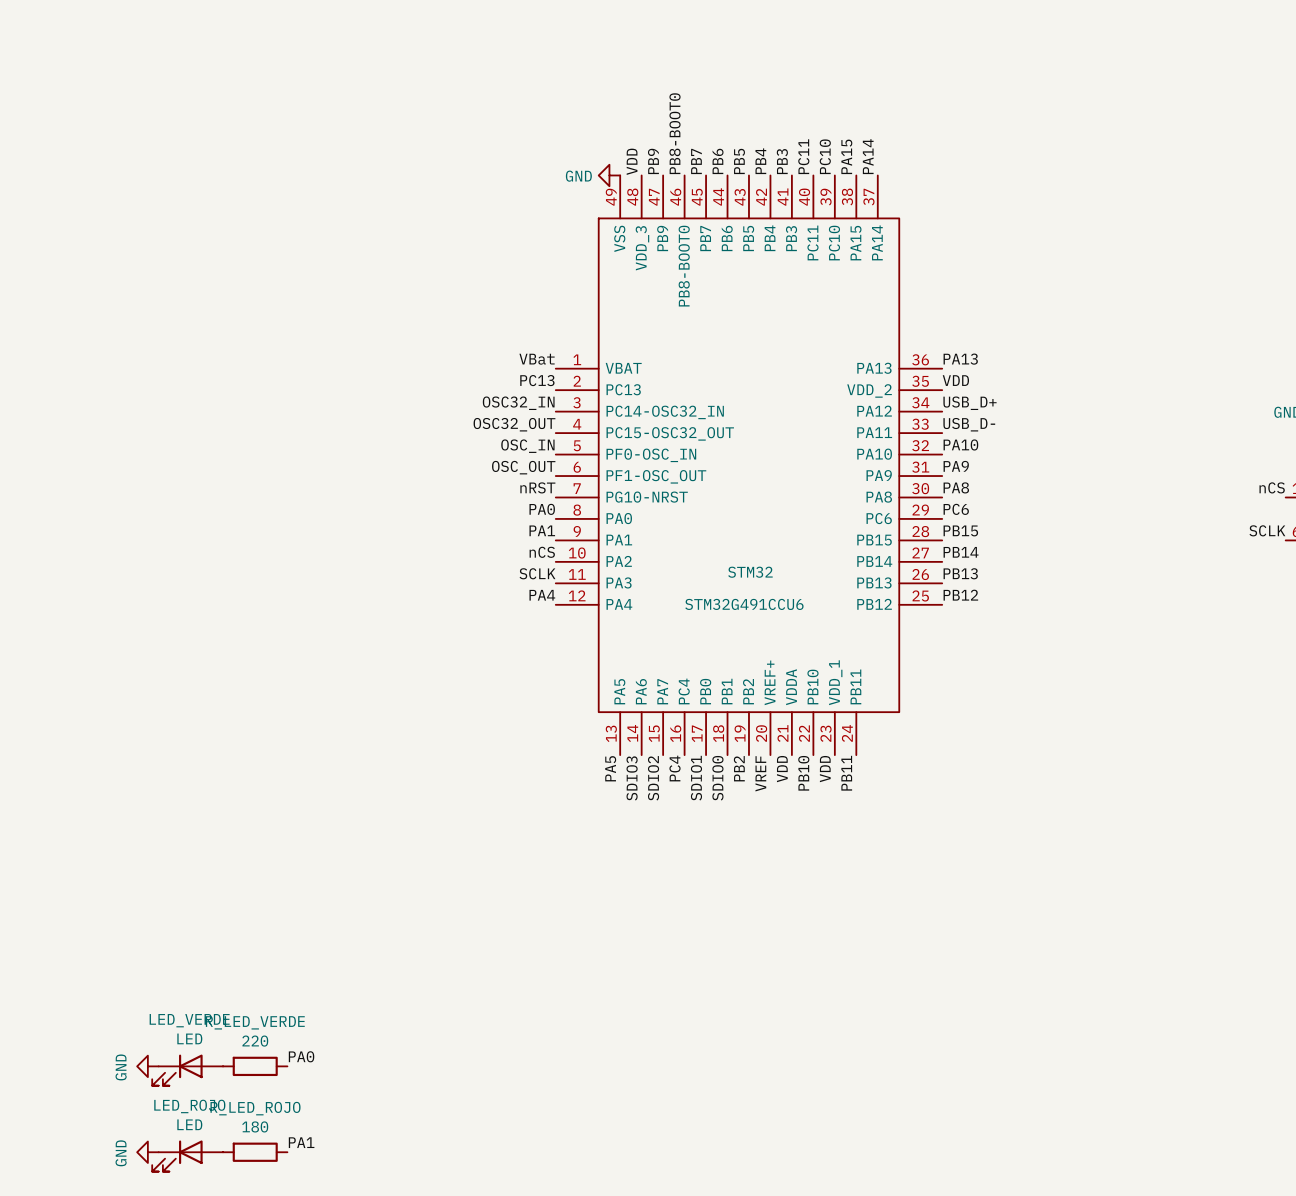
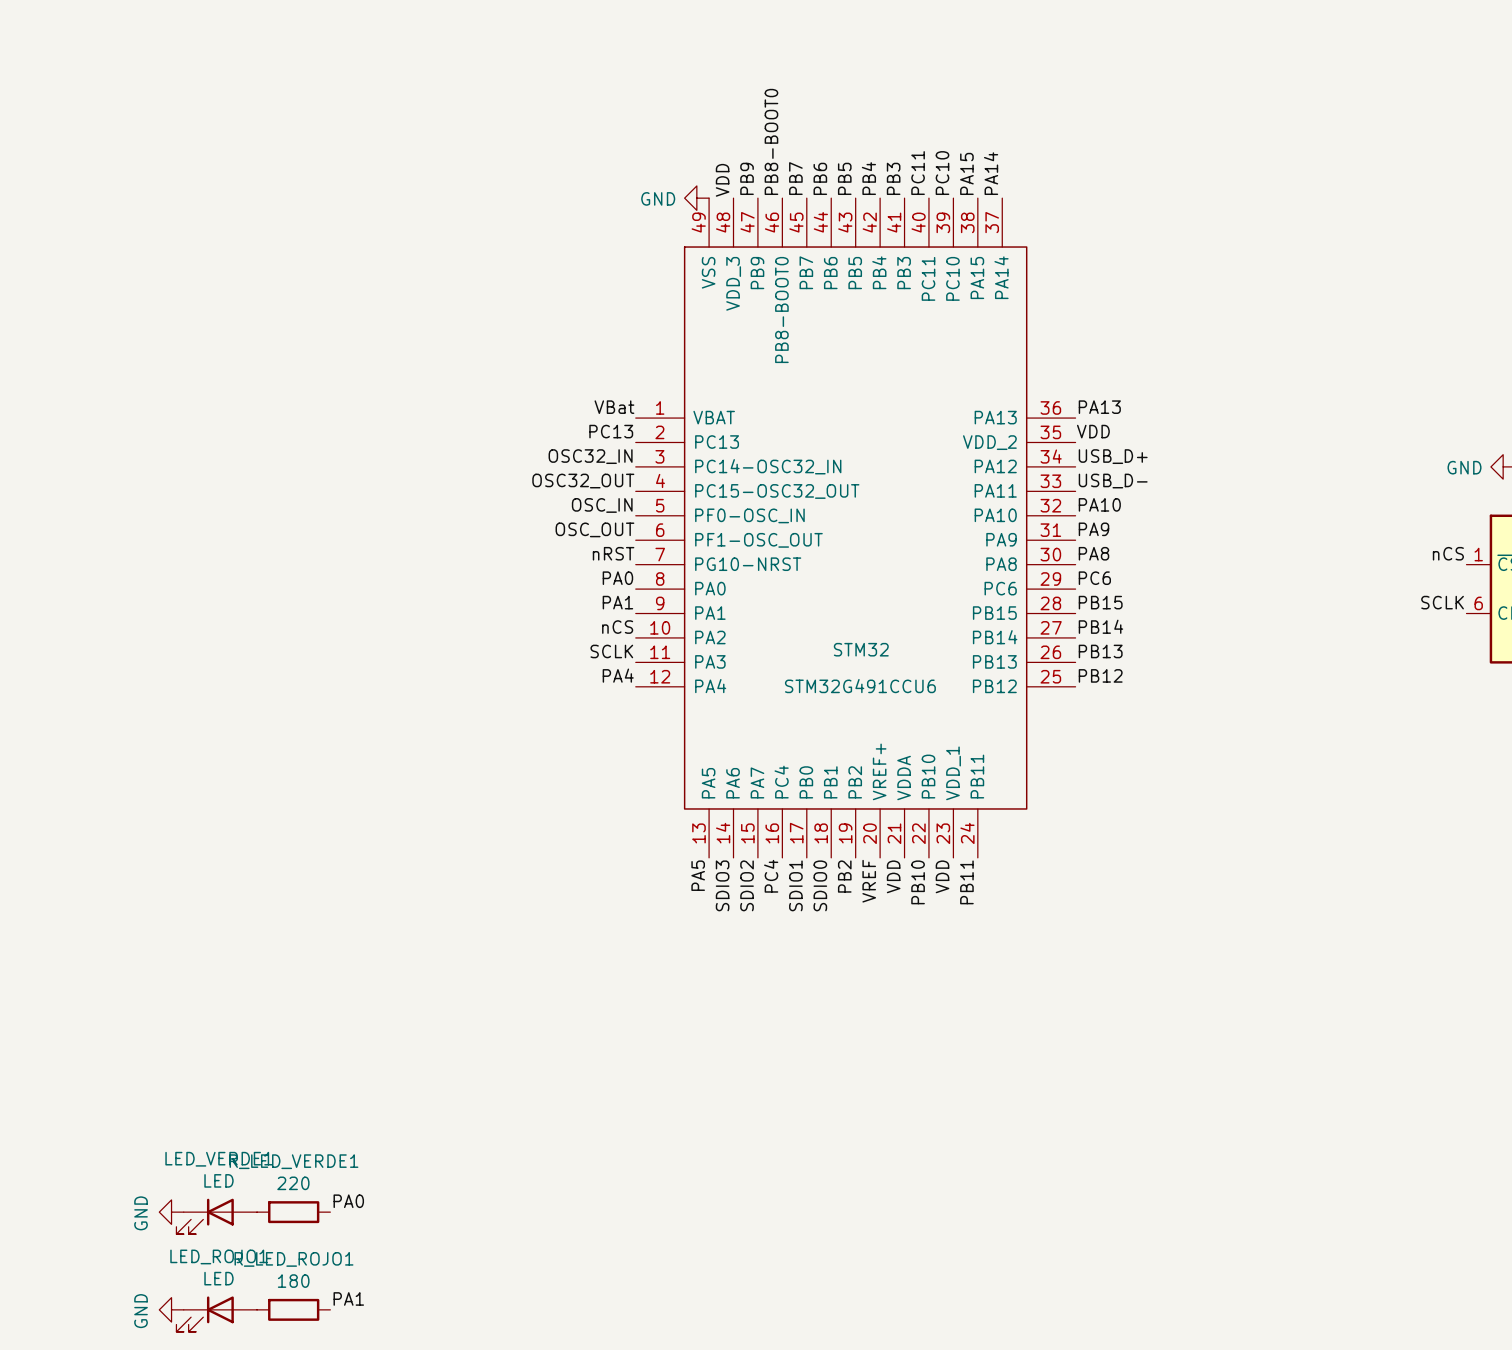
LED_VERDE name: LED_VERDE (189, 1020) -> LED_VERDE1 (218, 1159)
R_LED_VERDE name: R_LED_VERDE (255, 1022) -> R_LED_VERDE1 (293, 1161)
LED_ROJO name: LED_ROJO (189, 1106) -> LED_ROJO1 (218, 1256)
R_LED_ROJO name: R_LED_ROJO (255, 1108) -> R_LED_ROJO1 (293, 1259)

